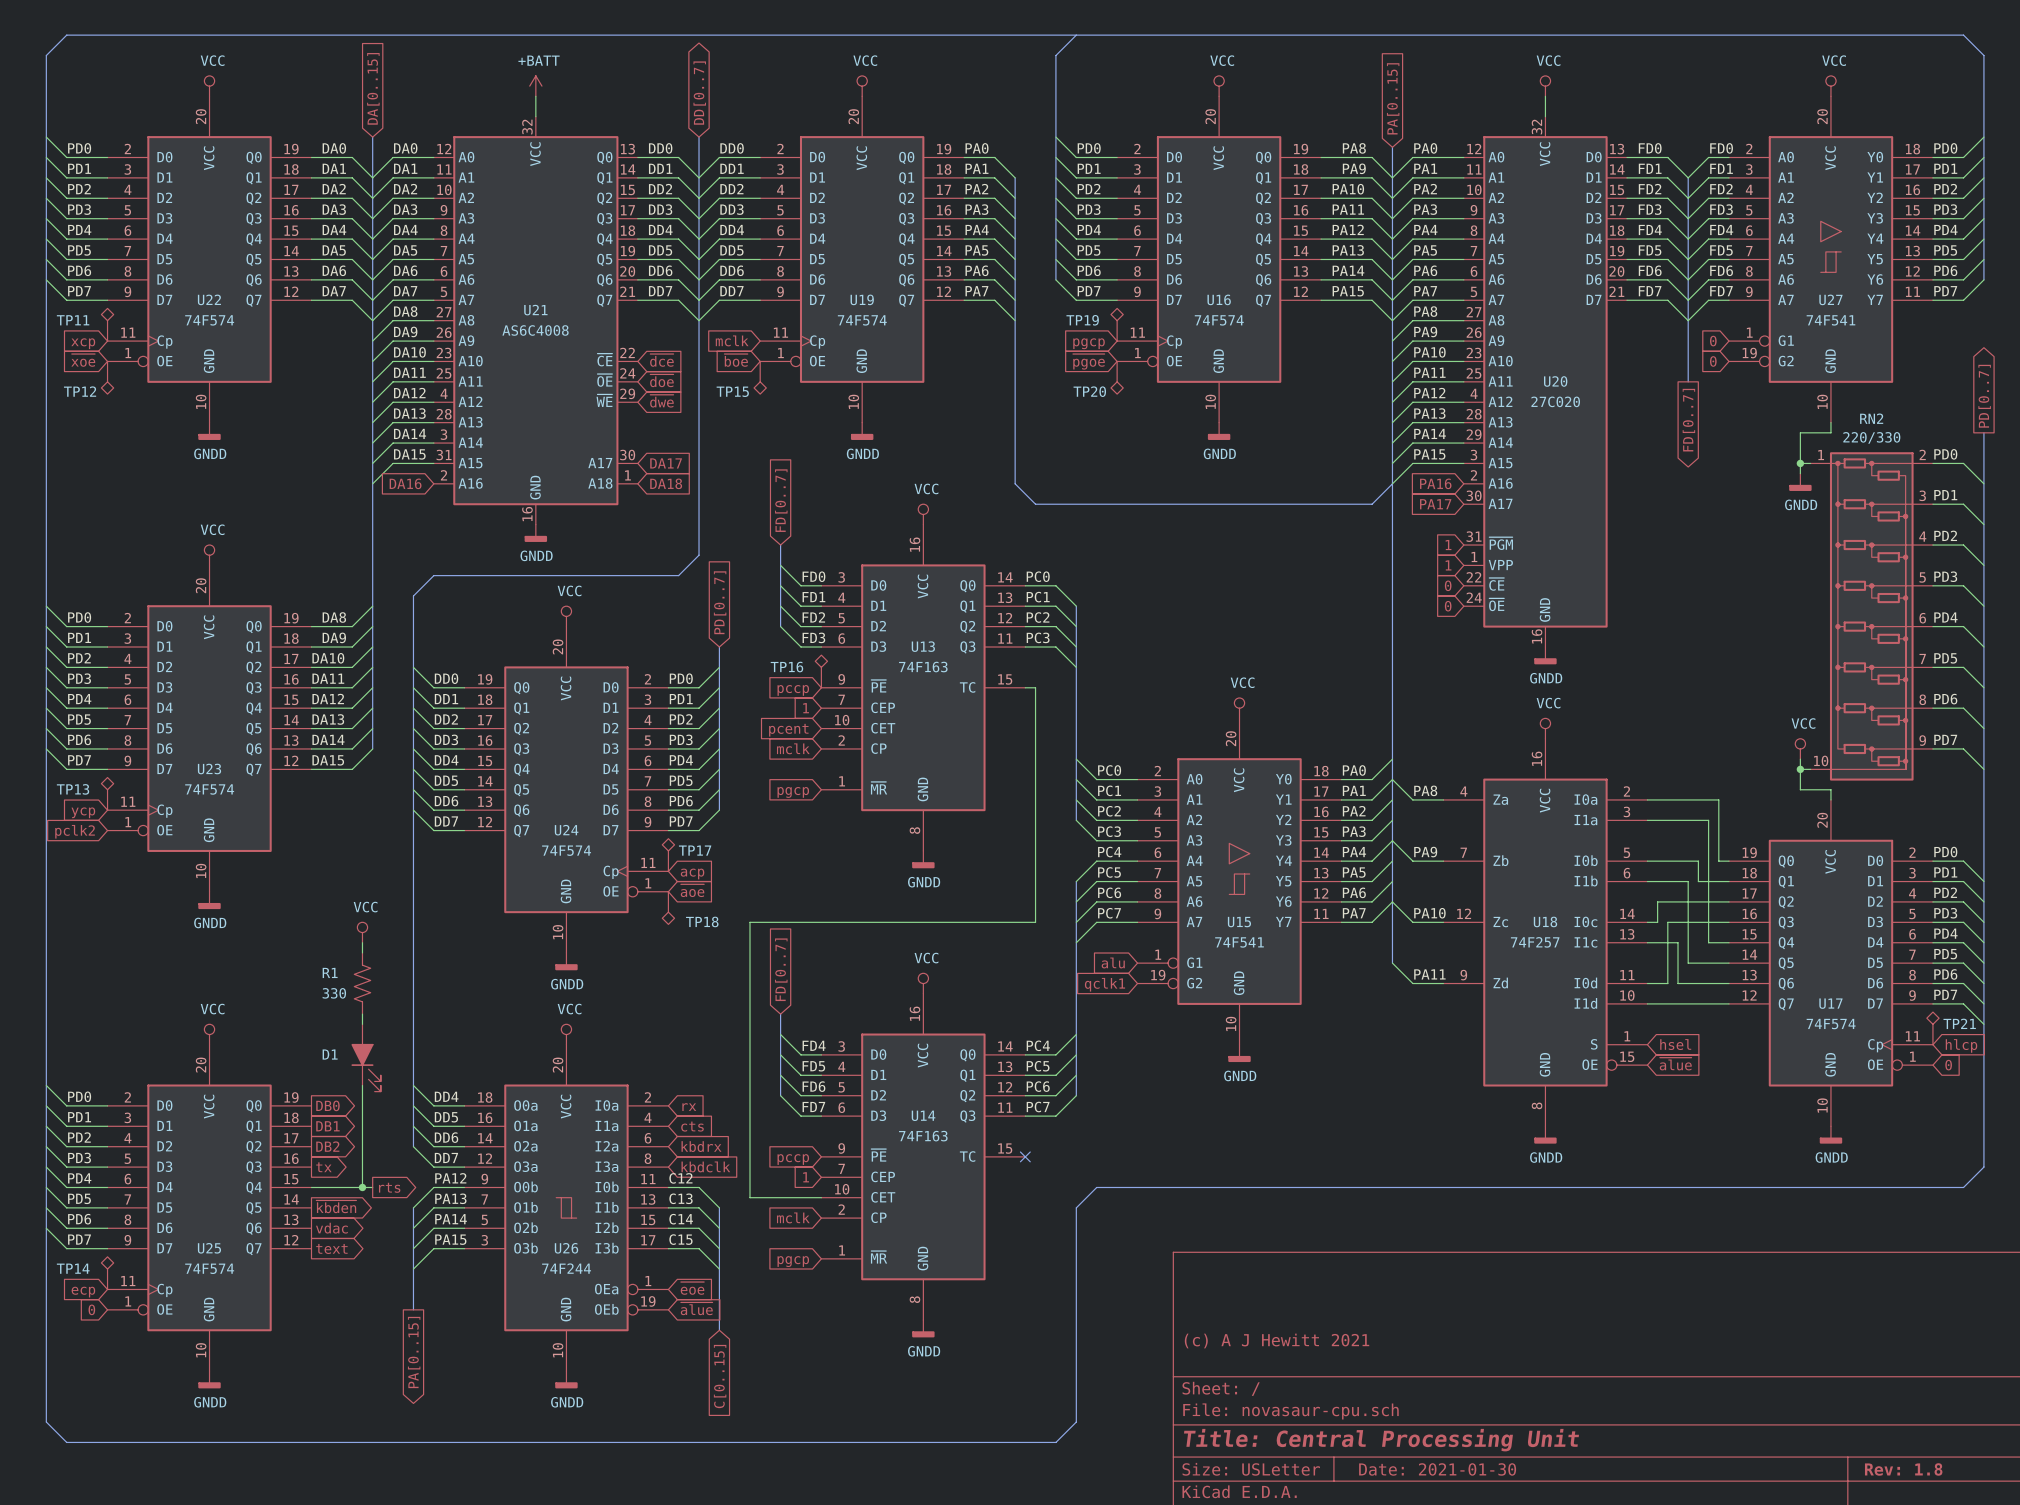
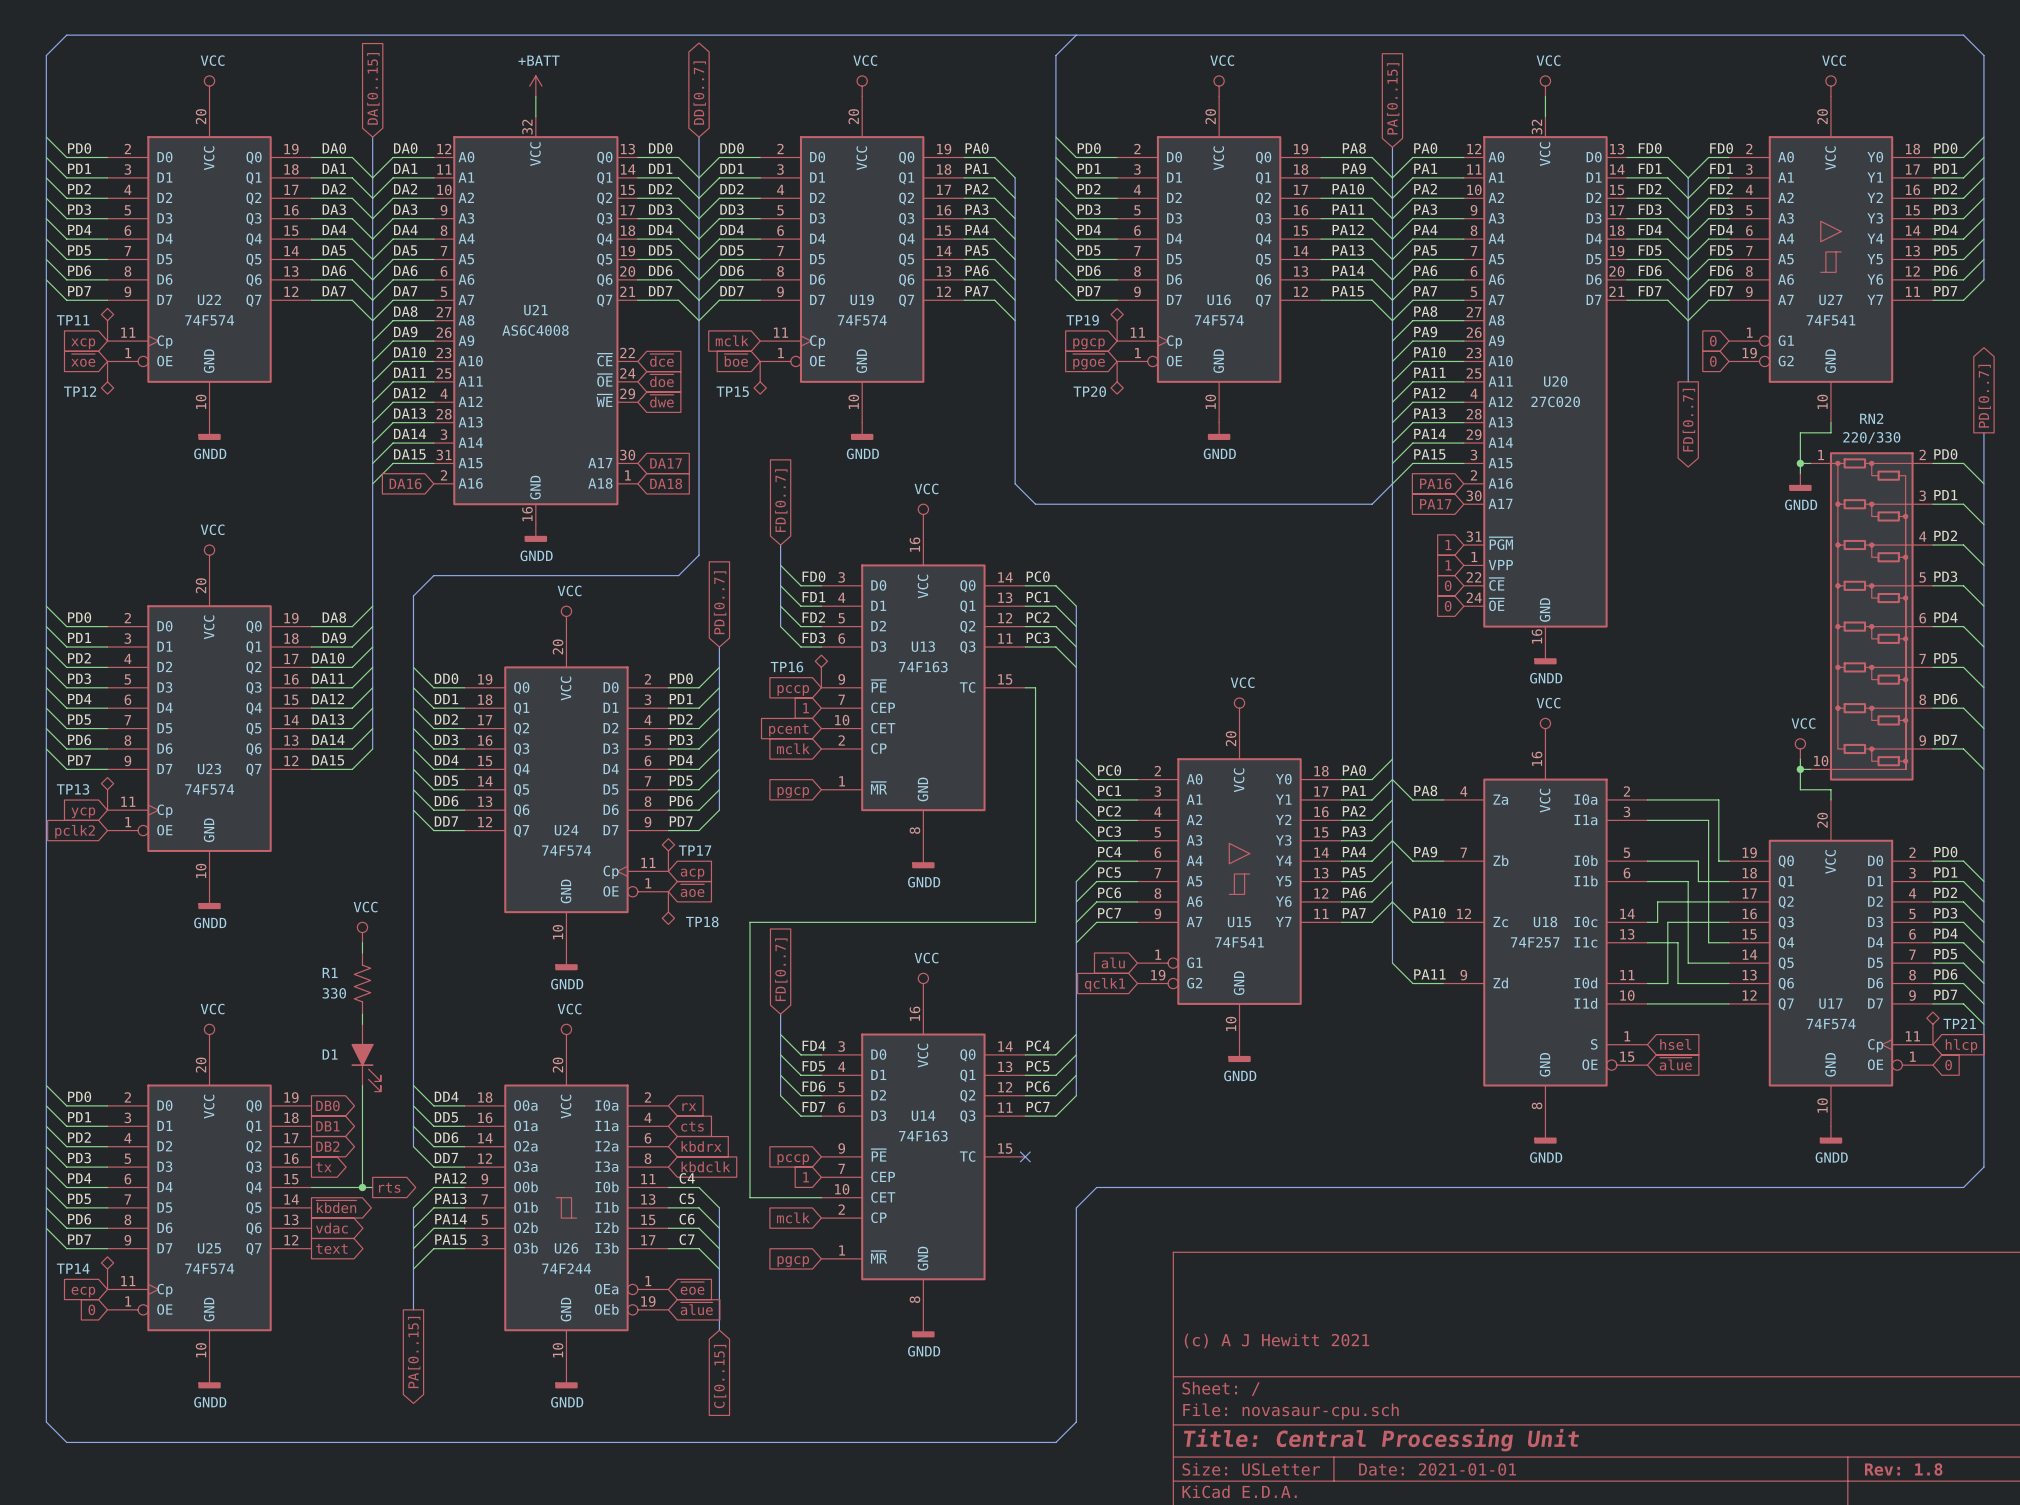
label: C12 (680, 1178) -> none
label: none -> C4 (687, 1178)
label: C13 (680, 1198) -> none
label: none -> C5 (686, 1198)
label: C14 (681, 1219) -> none
label: none -> C6 (687, 1219)
label: C15 (680, 1239) -> none
label: none -> C7 (686, 1239)
title block: Date: 2021-01-30 (1437, 1469) -> Date: 2021-01-01 (1437, 1469)

